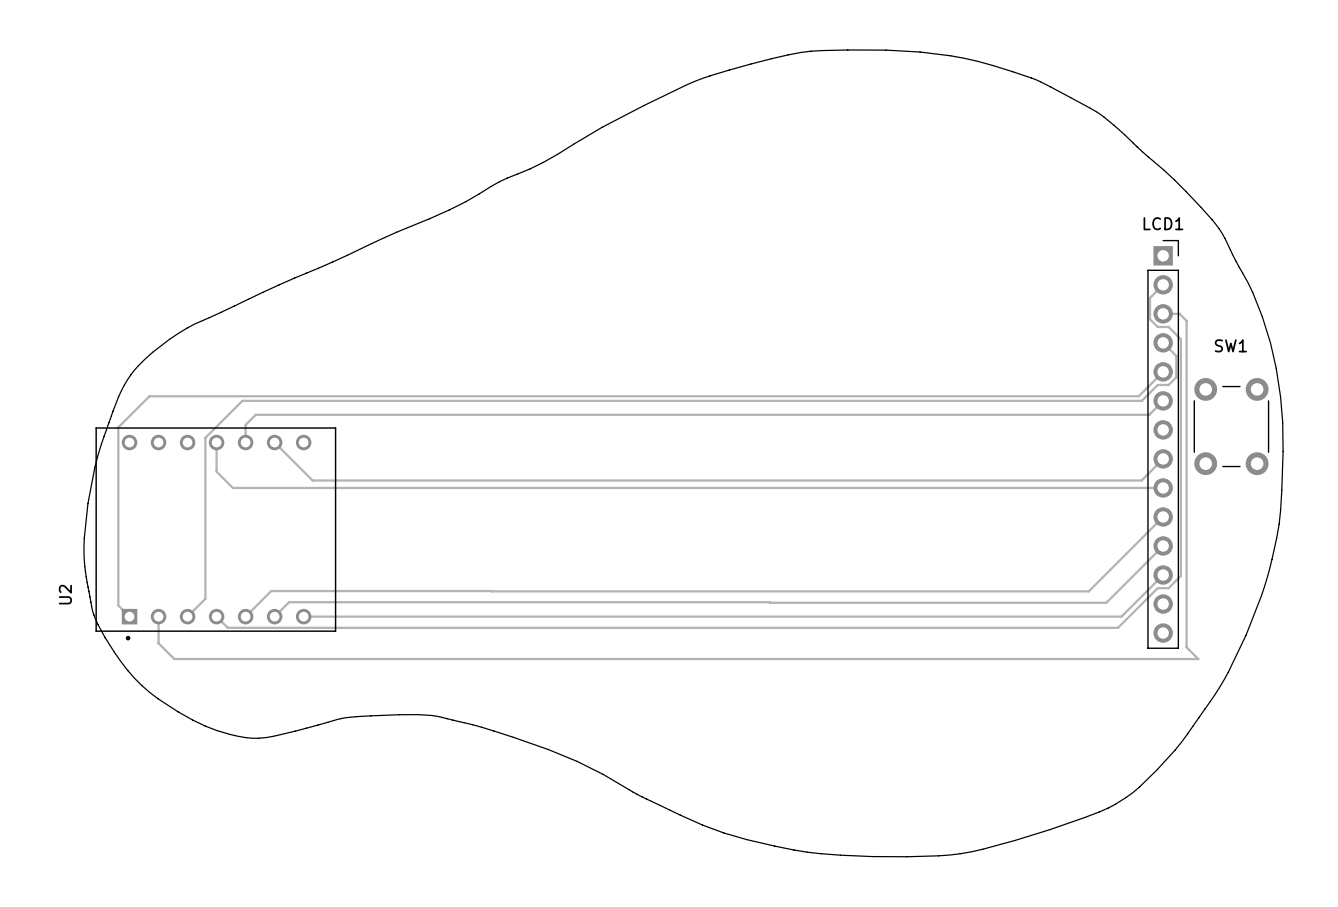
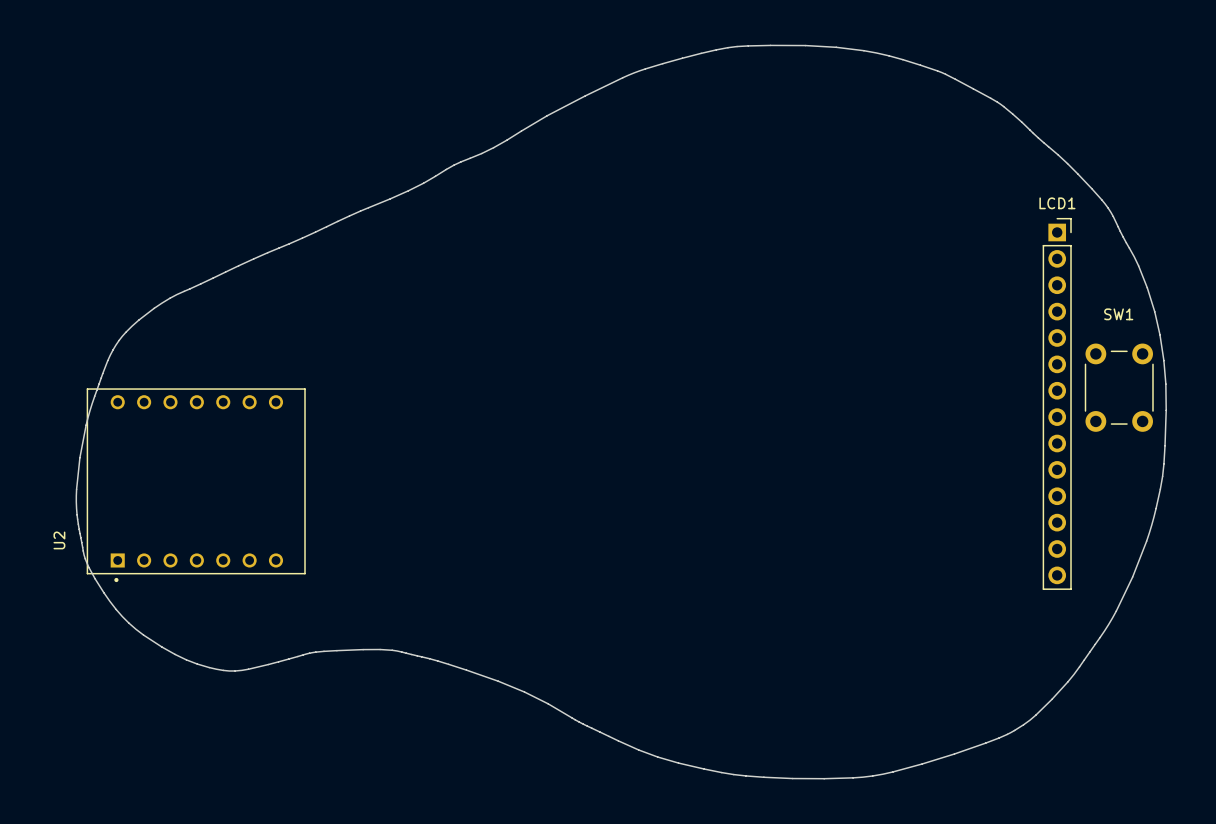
track: (1163, 284) (1150, 297) (1150, 319) (1157, 326) (1168, 326) (1180, 339) (1180, 575) (1168, 588) (1157, 588) (1118, 627) (227, 627) (216, 616) -> none
track: (1163, 313) (1179, 313) (1186, 320) (1186, 647) (1198, 659) (174, 659) (158, 643) (158, 616) -> none
track: (1163, 342) (1176, 356) (1176, 377) (1168, 385) (1157, 385) (1141, 400) (242, 400) (205, 437) (205, 598) (187, 616) -> none
track: (1163, 371) (1138, 396) (149, 396) (118, 427) (118, 605) (129, 616) -> none
track: (1163, 400) (1149, 414) (255, 414) (245, 424) (245, 442) -> none
track: (216, 442) (216, 471) (232, 487) (1163, 487) -> none
track: (274, 442) (312, 480) (1141, 480) (1163, 458) -> none
track: (1163, 516) (1088, 591) (271, 591) (245, 616) -> none
track: (1163, 545) (1106, 602) (289, 602) (274, 616) -> none
track: (1163, 575) (1121, 616) (303, 616) -> none

